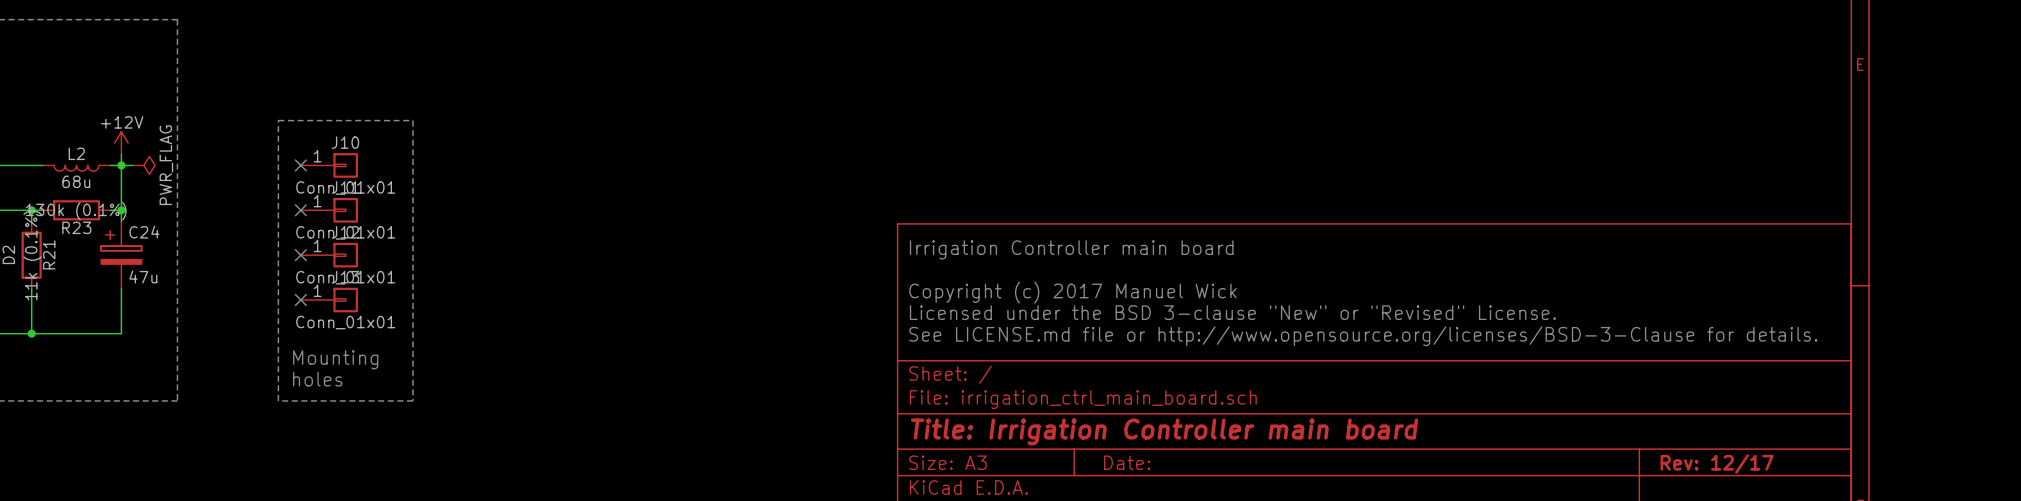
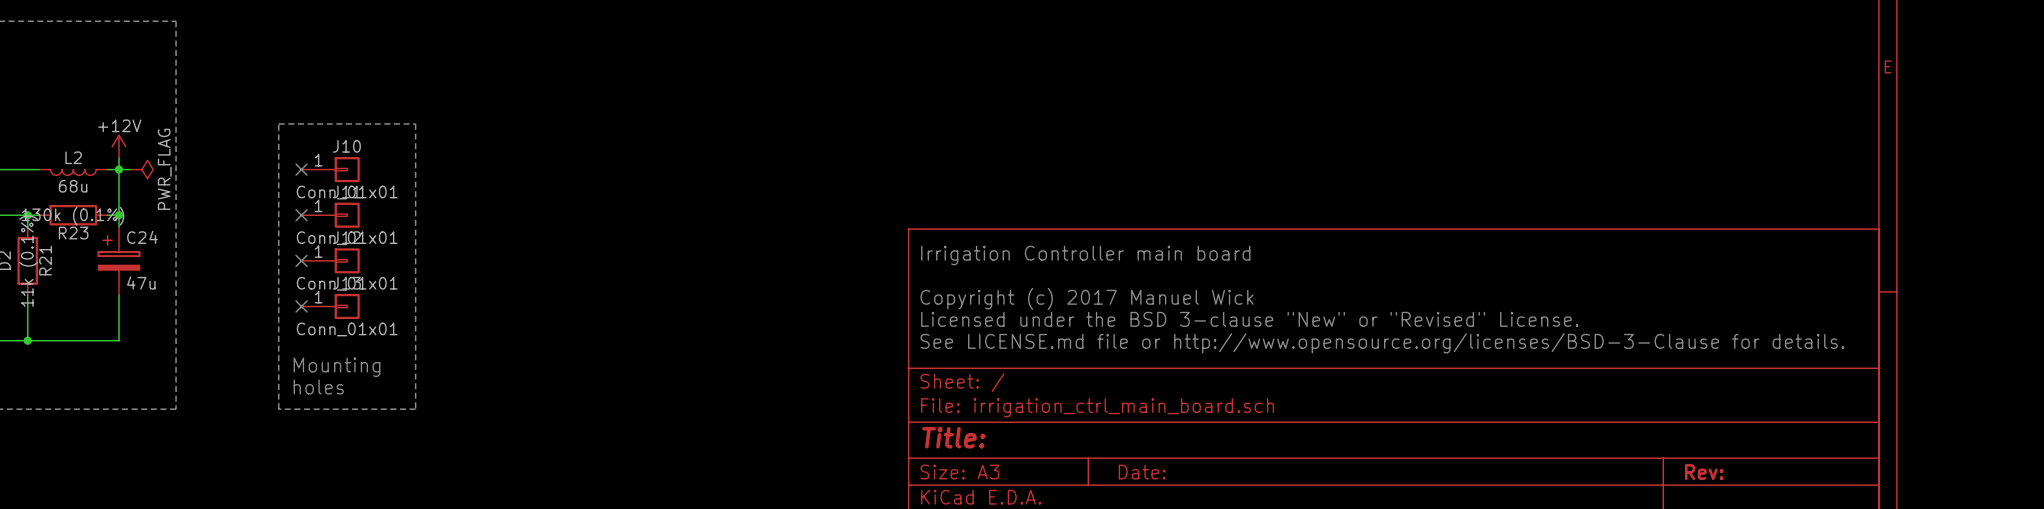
title block: Title: Irrigation Controller main board (1164, 431) -> Title: (953, 437)
title block: Rev: 12/17 (1717, 464) -> Rev: (1704, 472)

